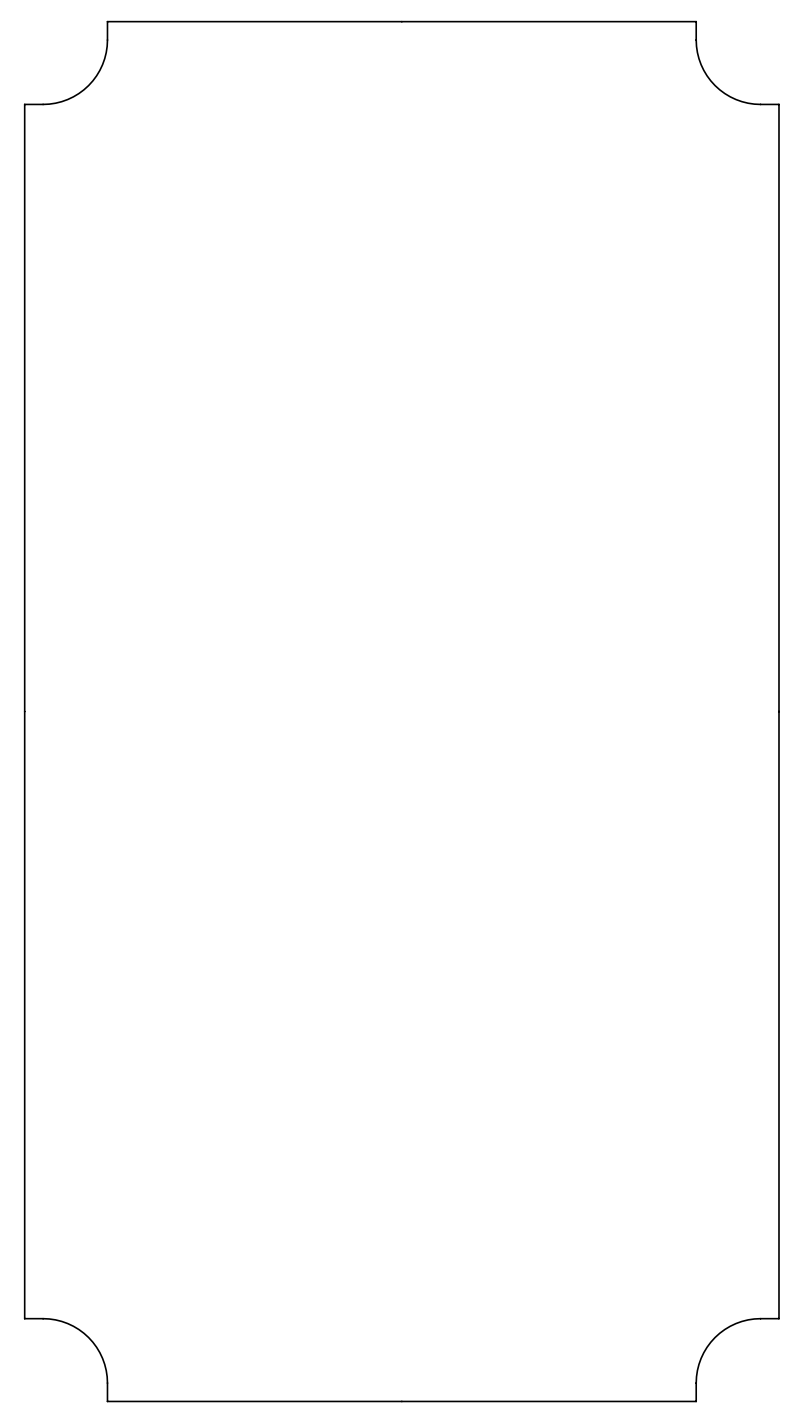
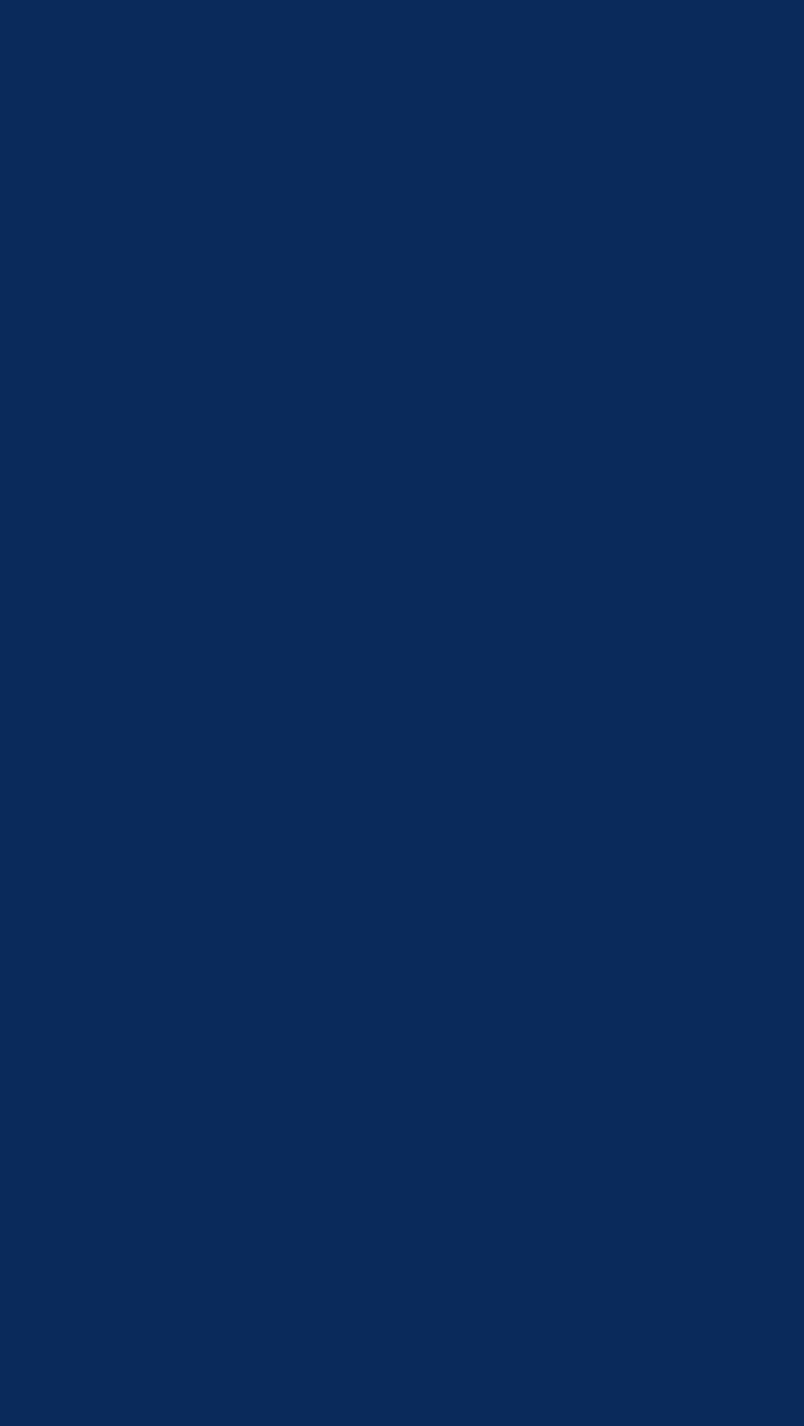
board edge: (696, 21) (696, 46) (698, 58) (707, 75) (715, 85) (730, 96) (741, 101) (754, 104) (778, 104) (778, 1318) (754, 1318) (741, 1321) (724, 1329) (715, 1337) (703, 1352) (698, 1364) (696, 1376) (696, 1401) (107, 1401) (107, 1376) (104, 1364) (99, 1352) (88, 1337) (73, 1326) (61, 1321) (49, 1318) (24, 1318) (24, 104) (49, 104) (61, 101) (78, 93) (88, 85) (99, 70) (104, 58) (107, 46) (107, 21) (696, 21) -> none

